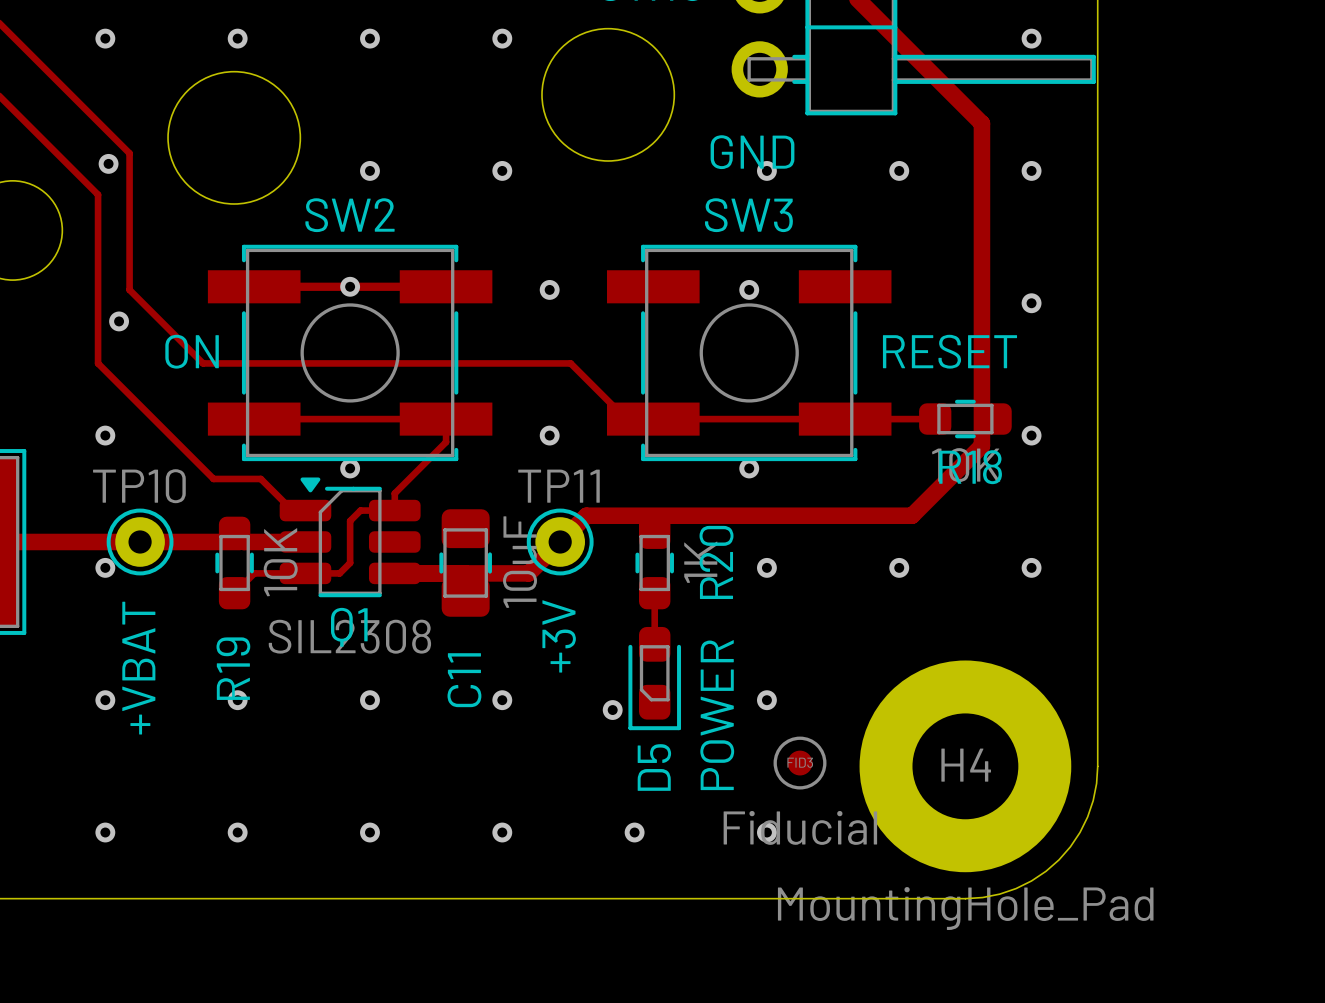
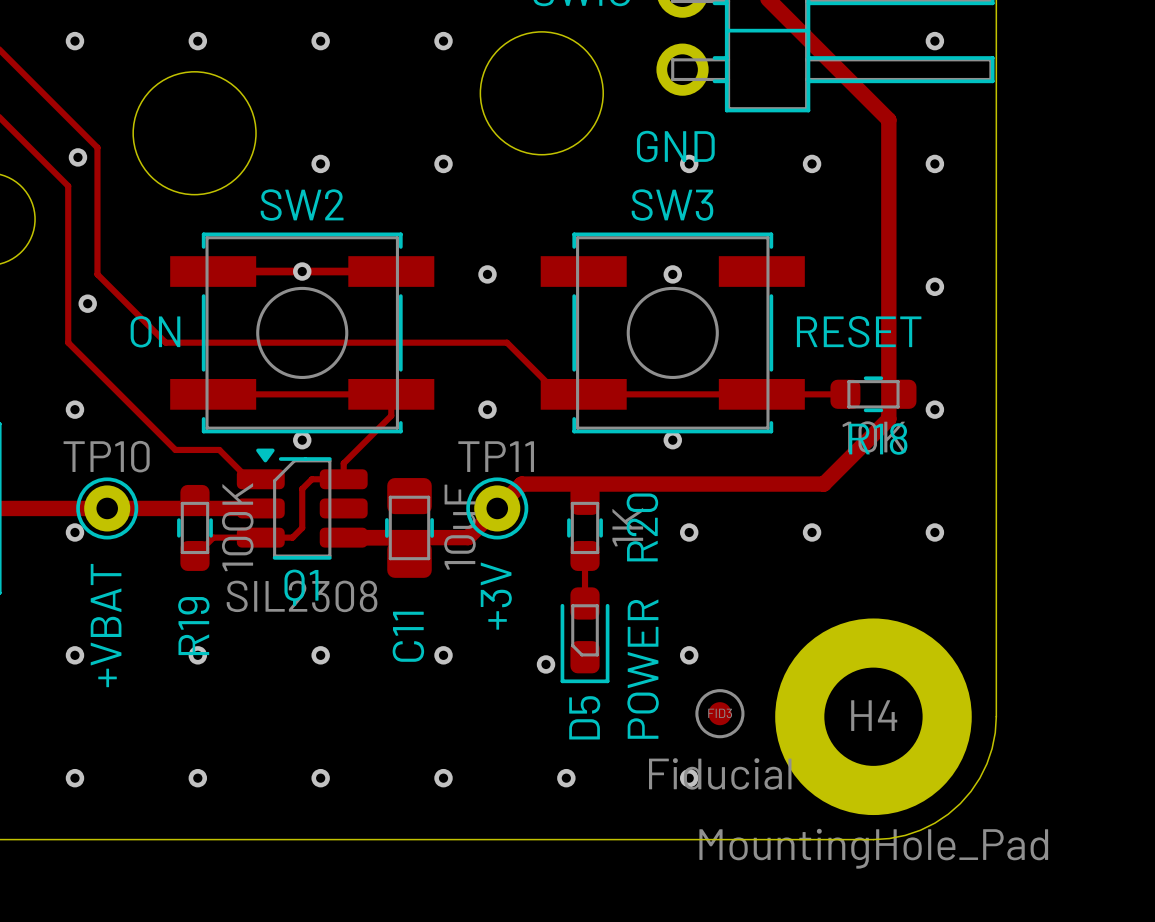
R19 value: 10K (280, 562) -> 100K (237, 527)

